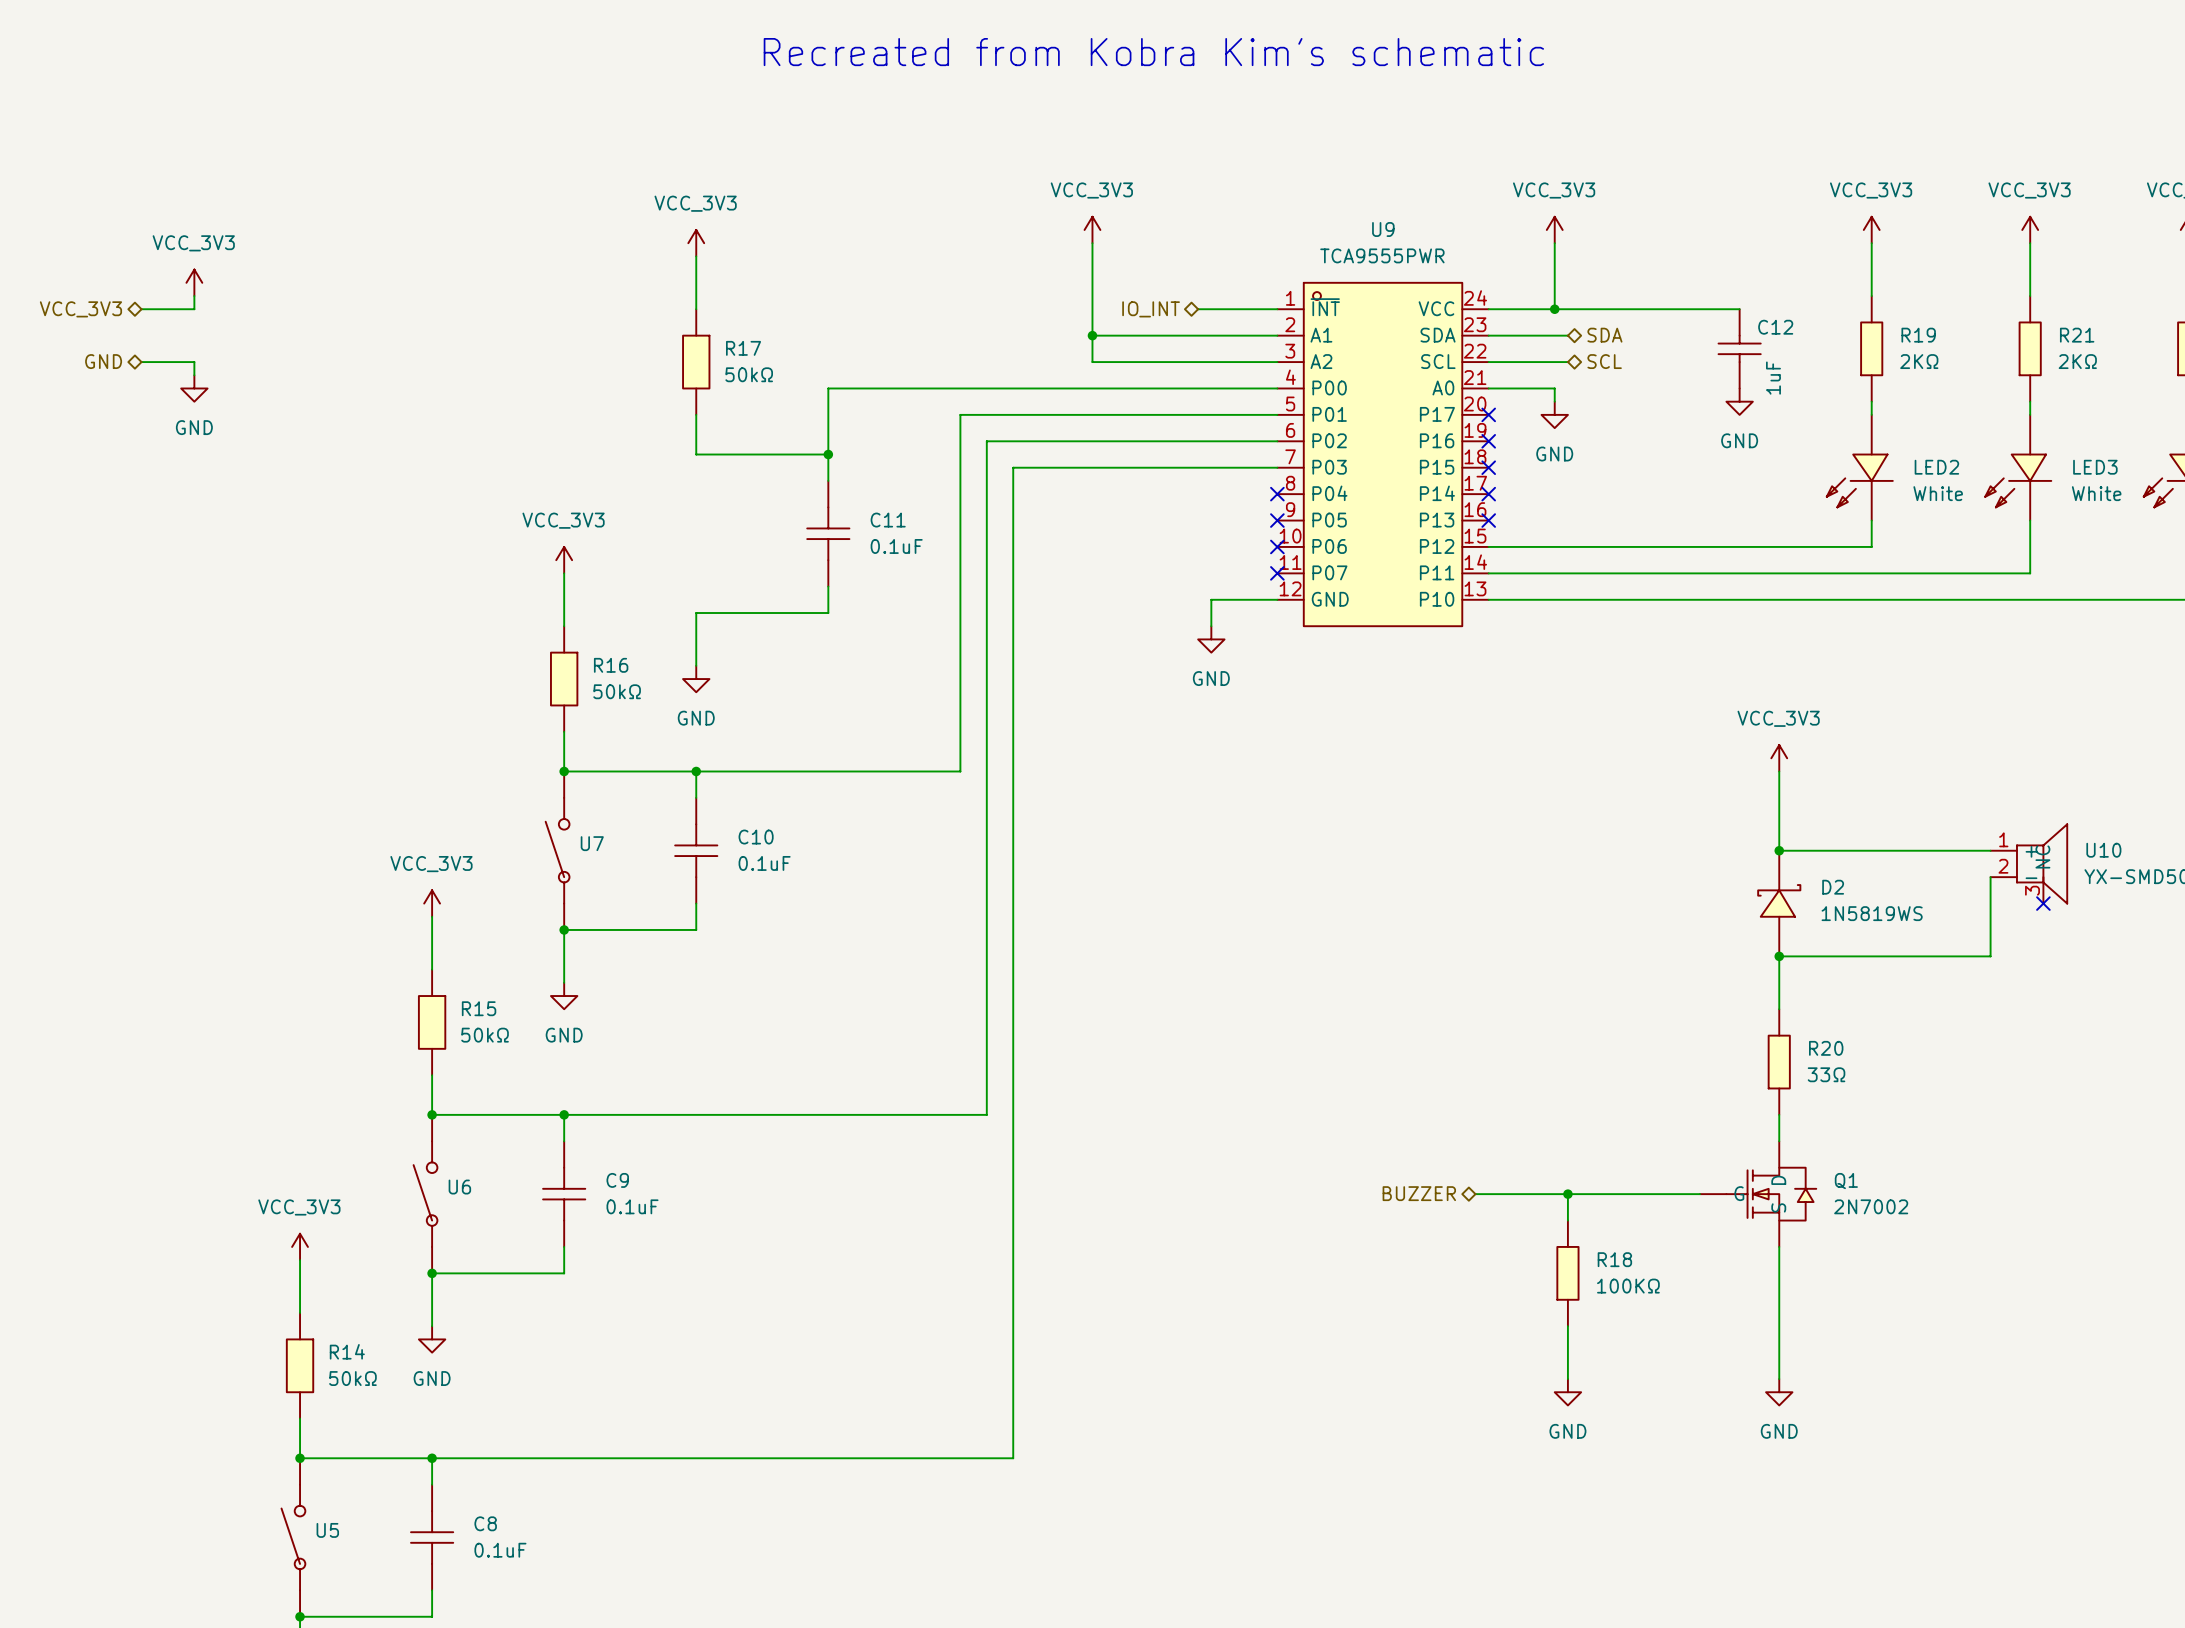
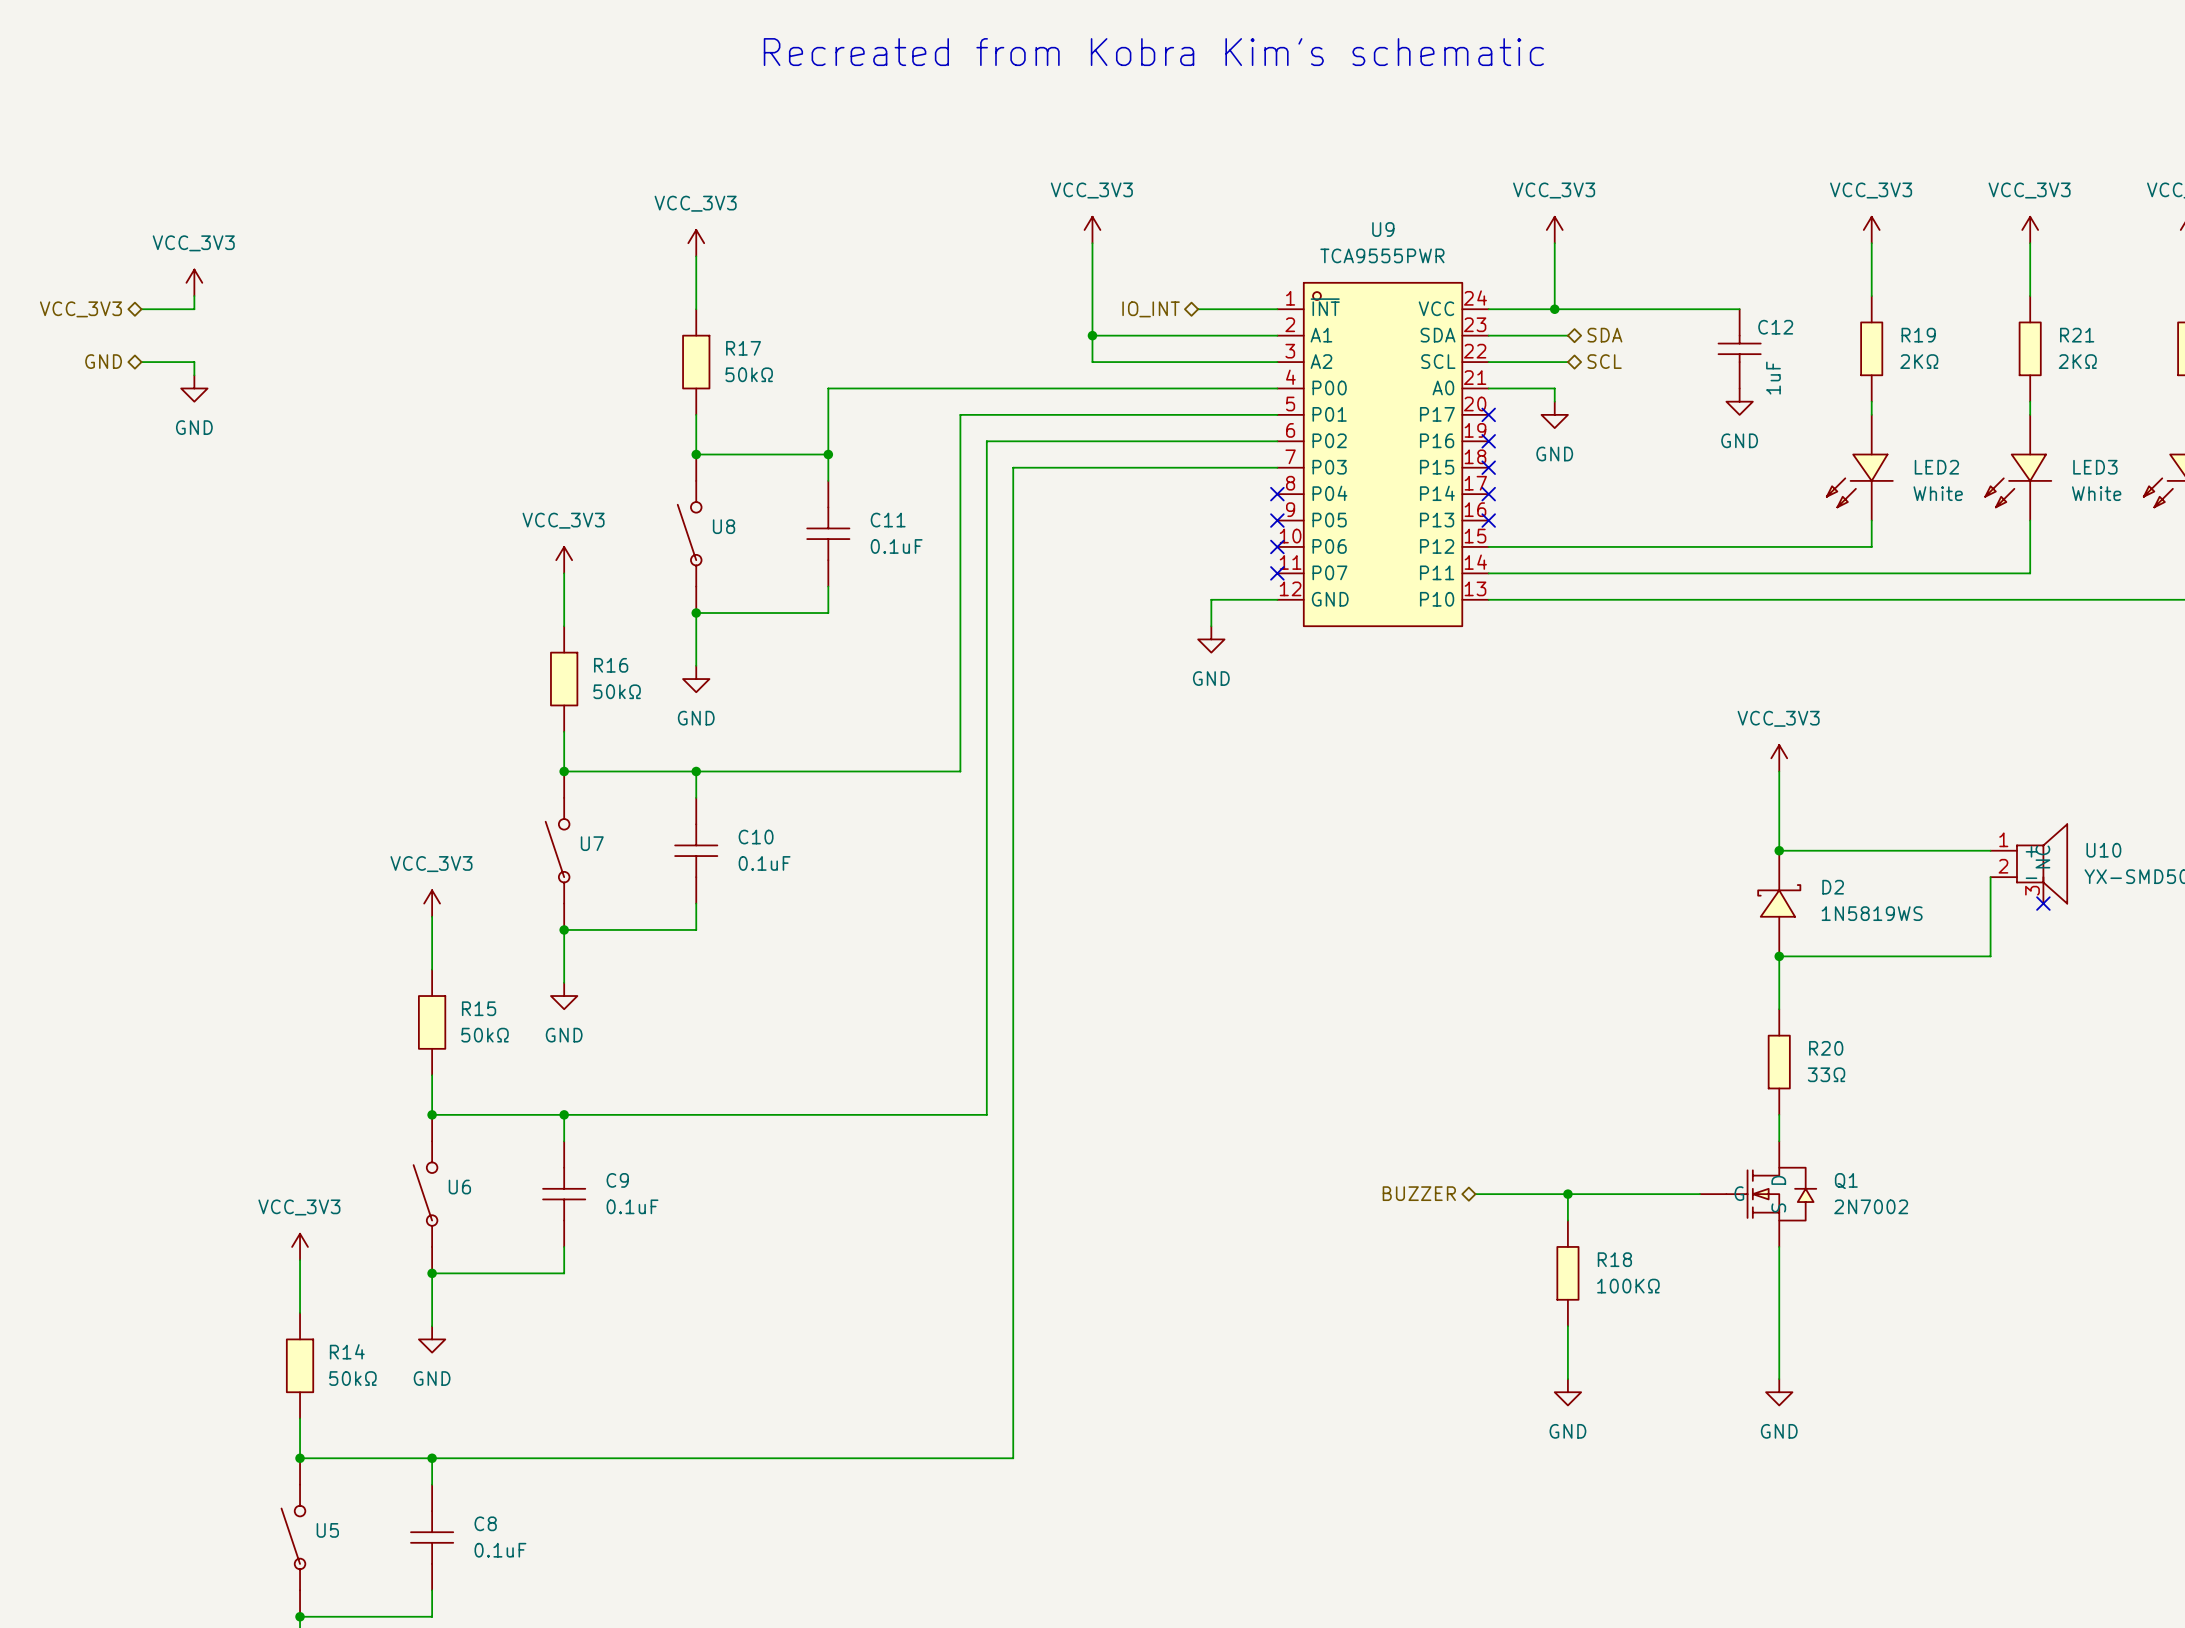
junction: none -> (696, 454)
U8: none -> (689, 533)
junction: none -> (696, 613)

